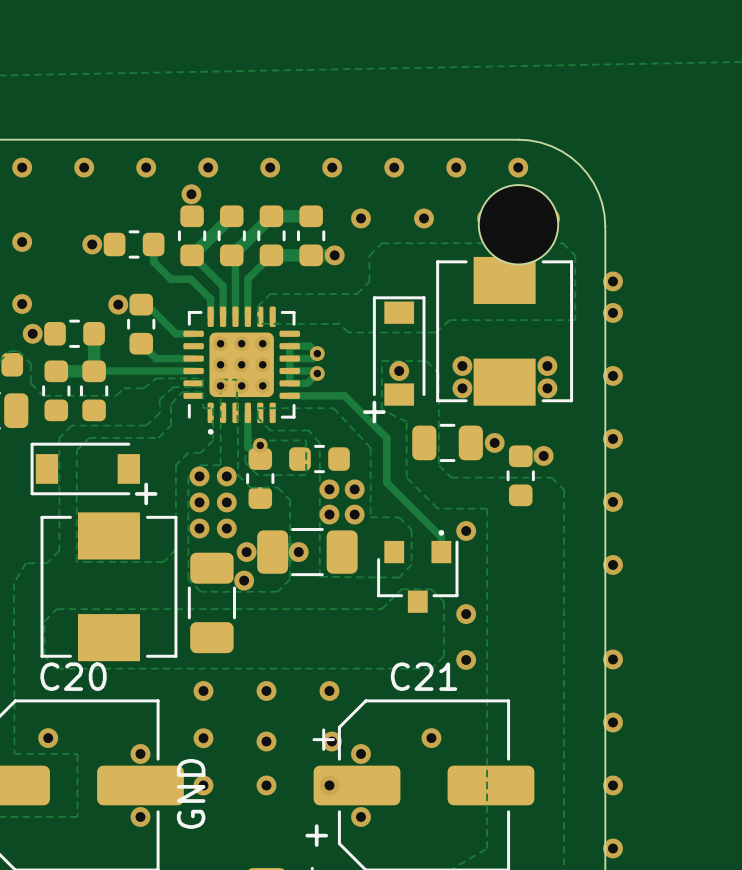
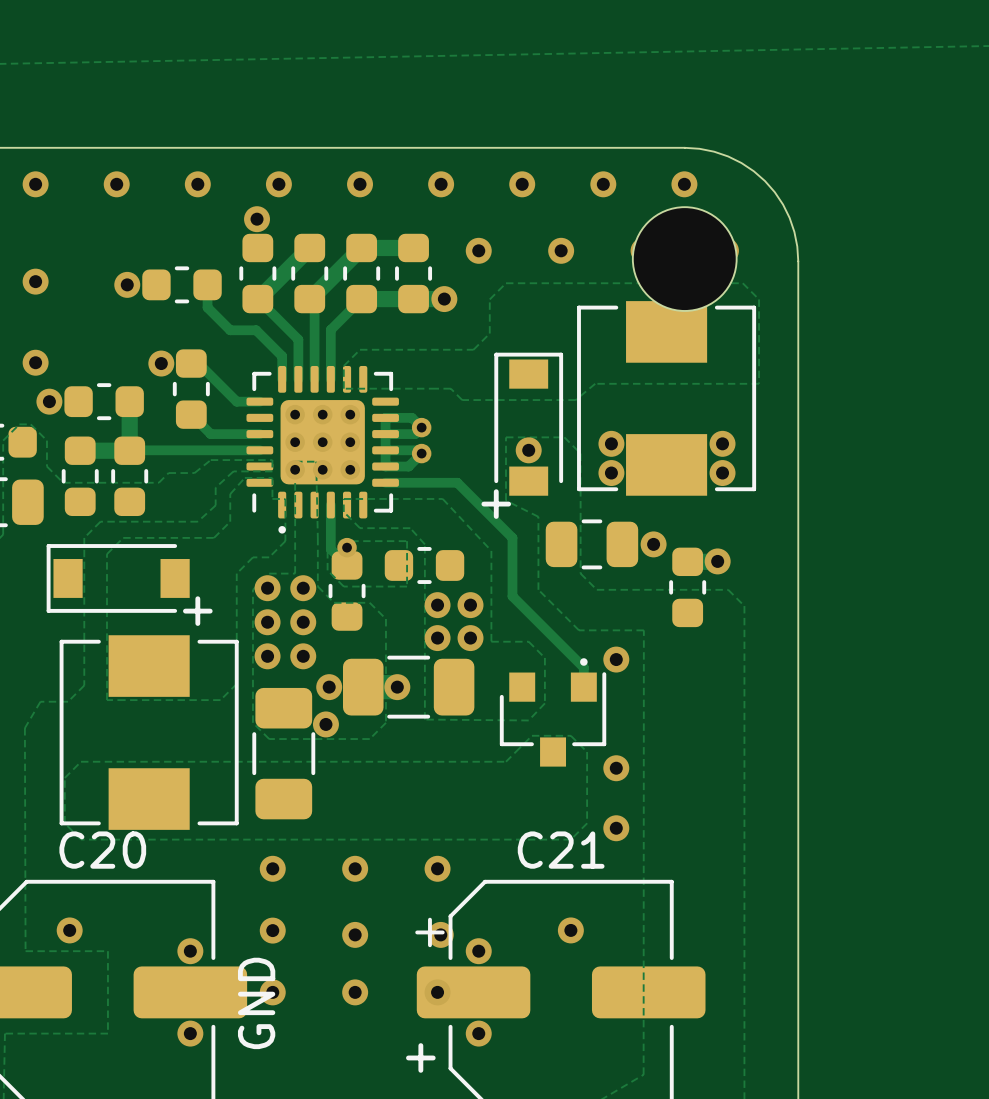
via: (613, 281) -> none
via: (613, 312) -> none
via: (613, 375) -> none
via: (613, 438) -> none
via: (613, 501) -> none
via: (613, 564) -> none
via: (613, 659) -> none
via: (613, 722) -> none
via: (613, 785) -> none
via: (613, 848) -> none

